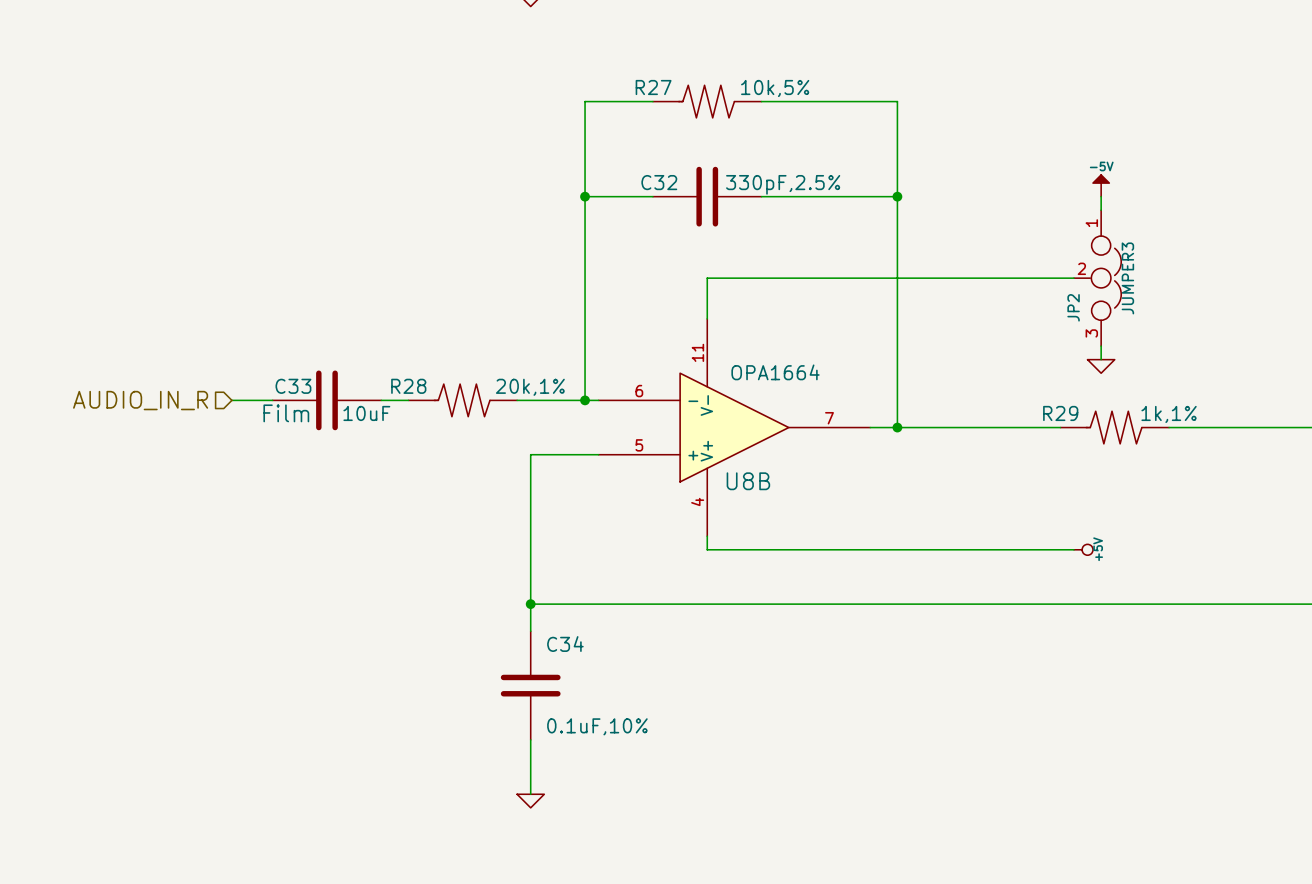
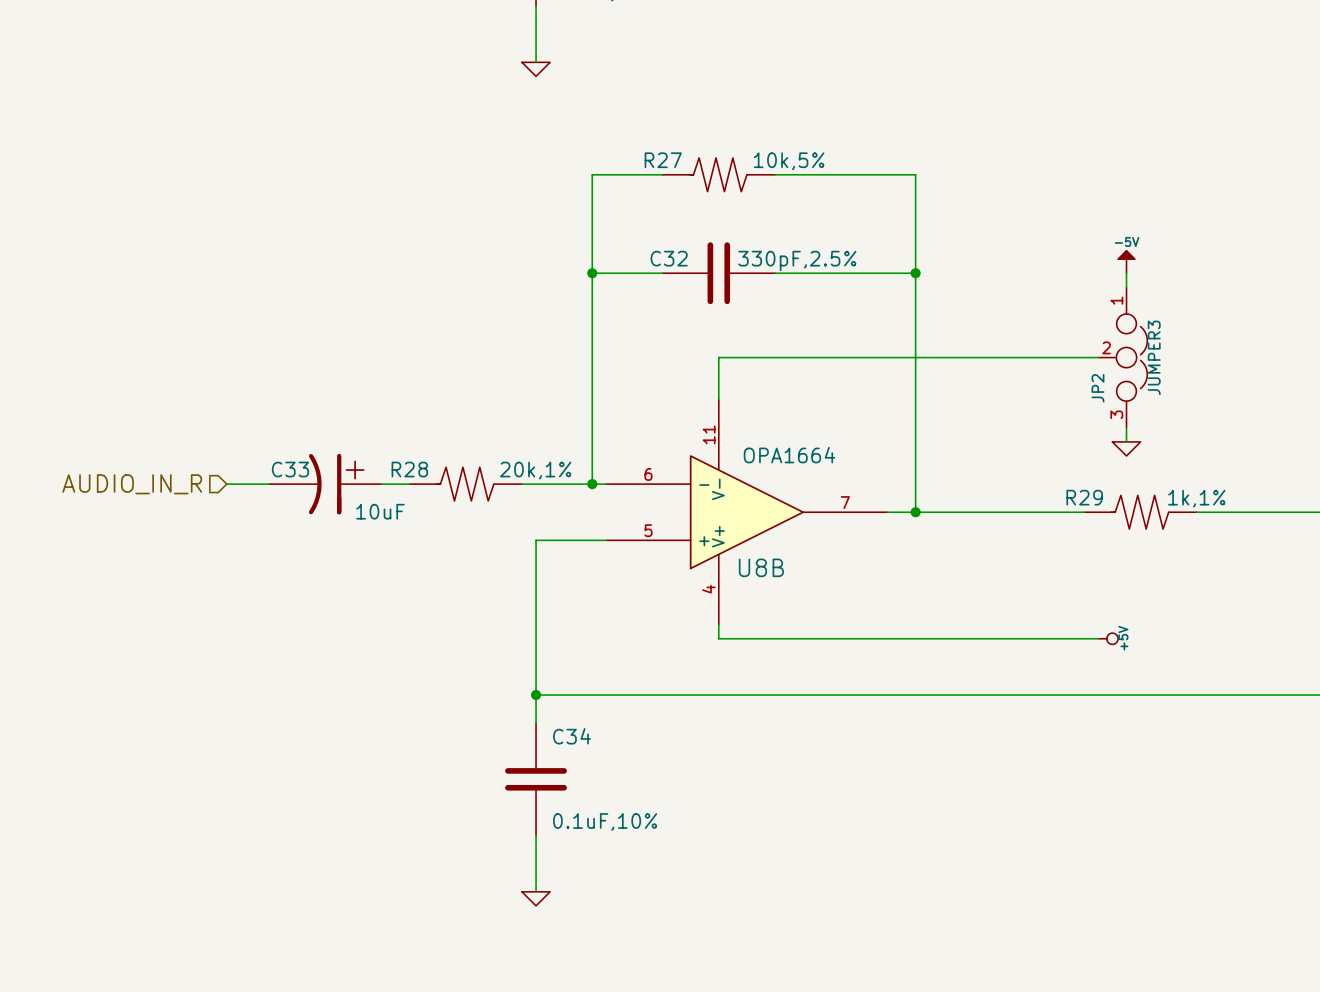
C33 symbol: [272, 370, 382, 431] -> [268, 453, 382, 515]
C33 text: Film (286, 413) -> none

